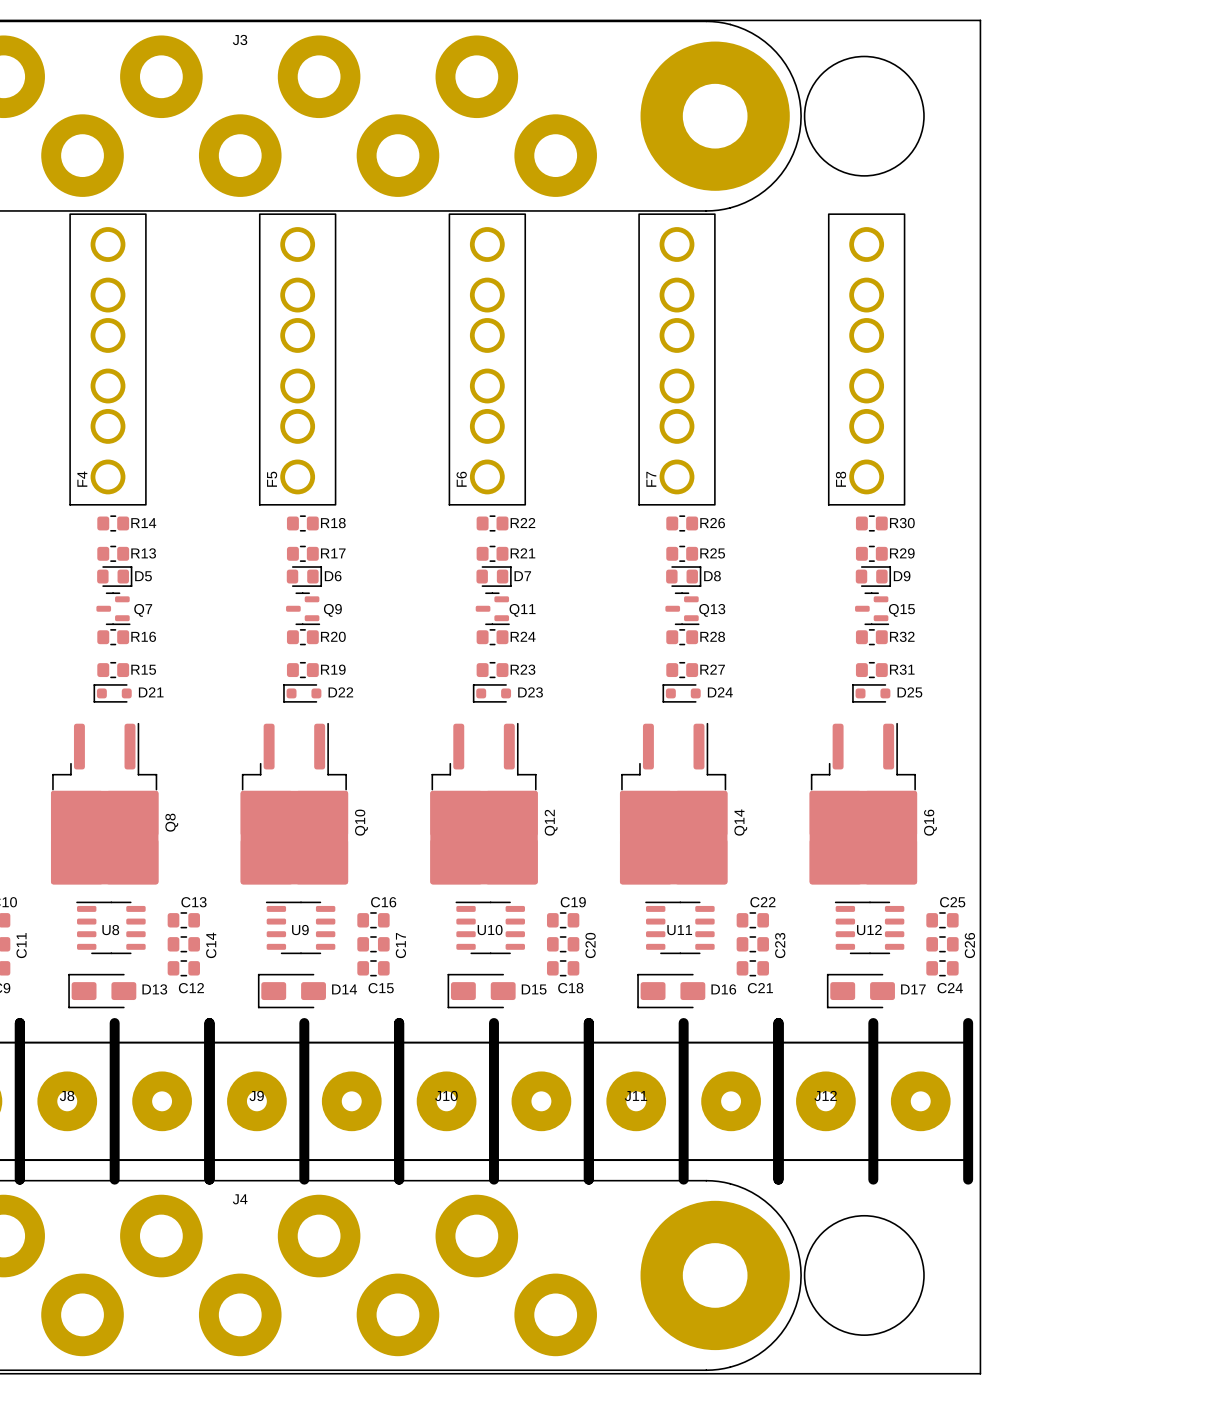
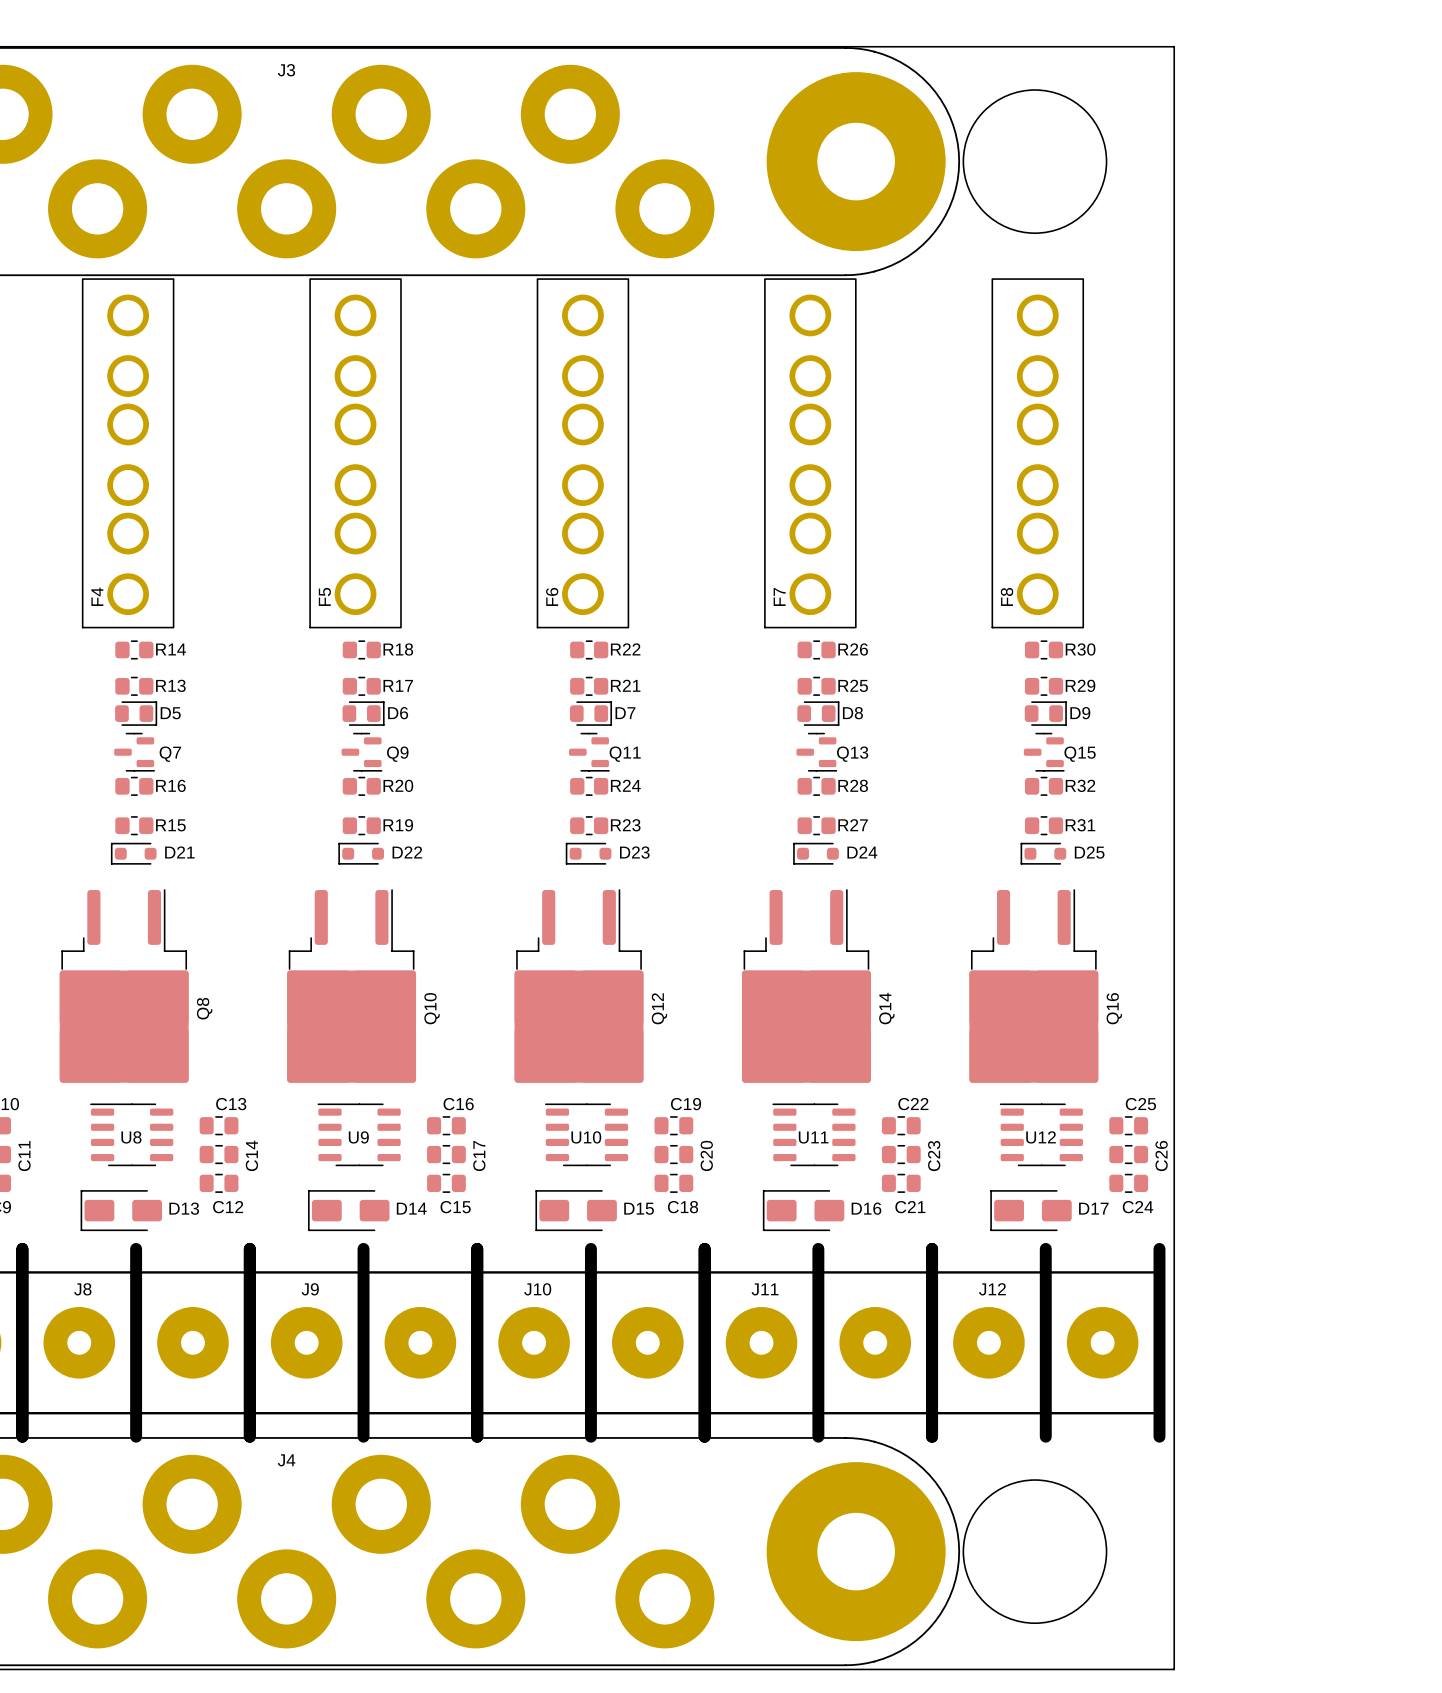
J8 name position: J8 (67, 1095) -> J8 (82, 1289)
J9 name position: J9 (256, 1095) -> J9 (310, 1289)
J10 name position: J10 (446, 1095) -> J10 (537, 1289)
J12 name position: J12 (825, 1095) -> J12 (992, 1289)
J11 name position: J11 (636, 1096) -> J11 (765, 1289)

